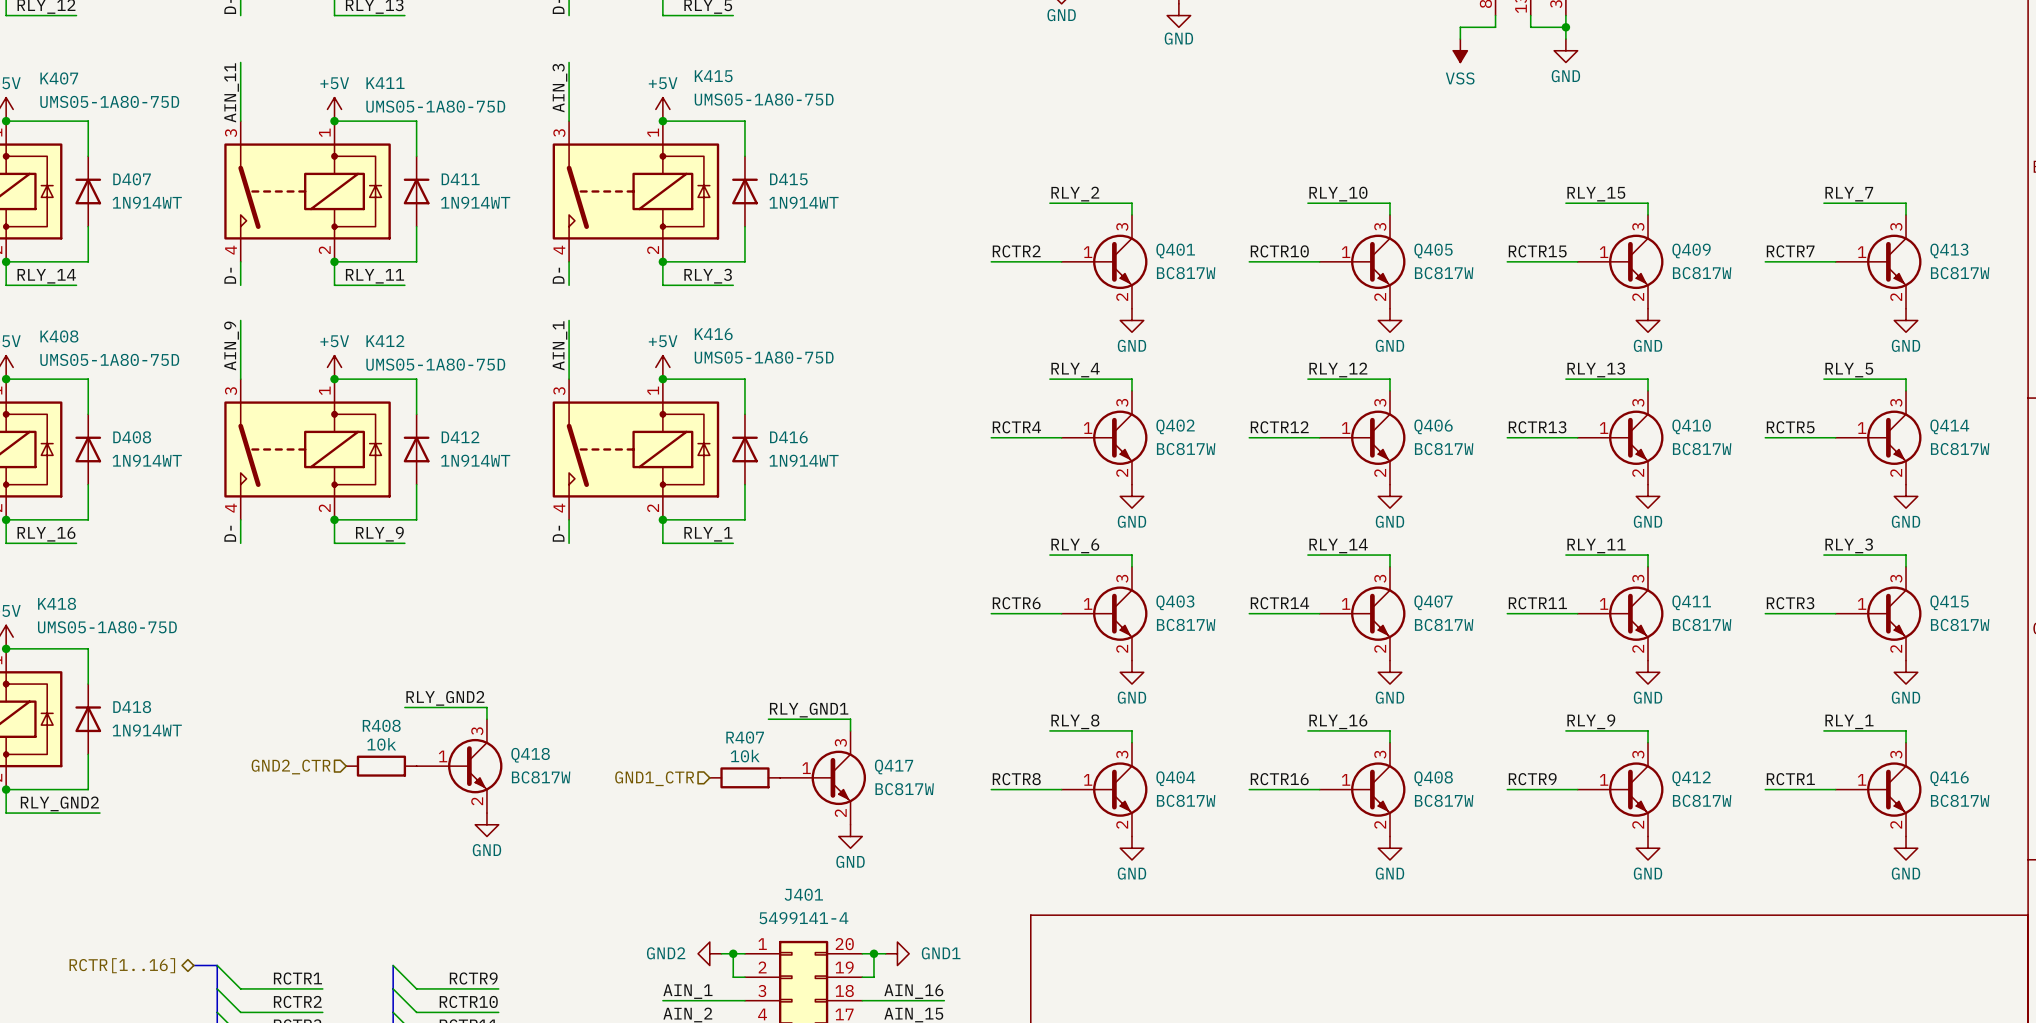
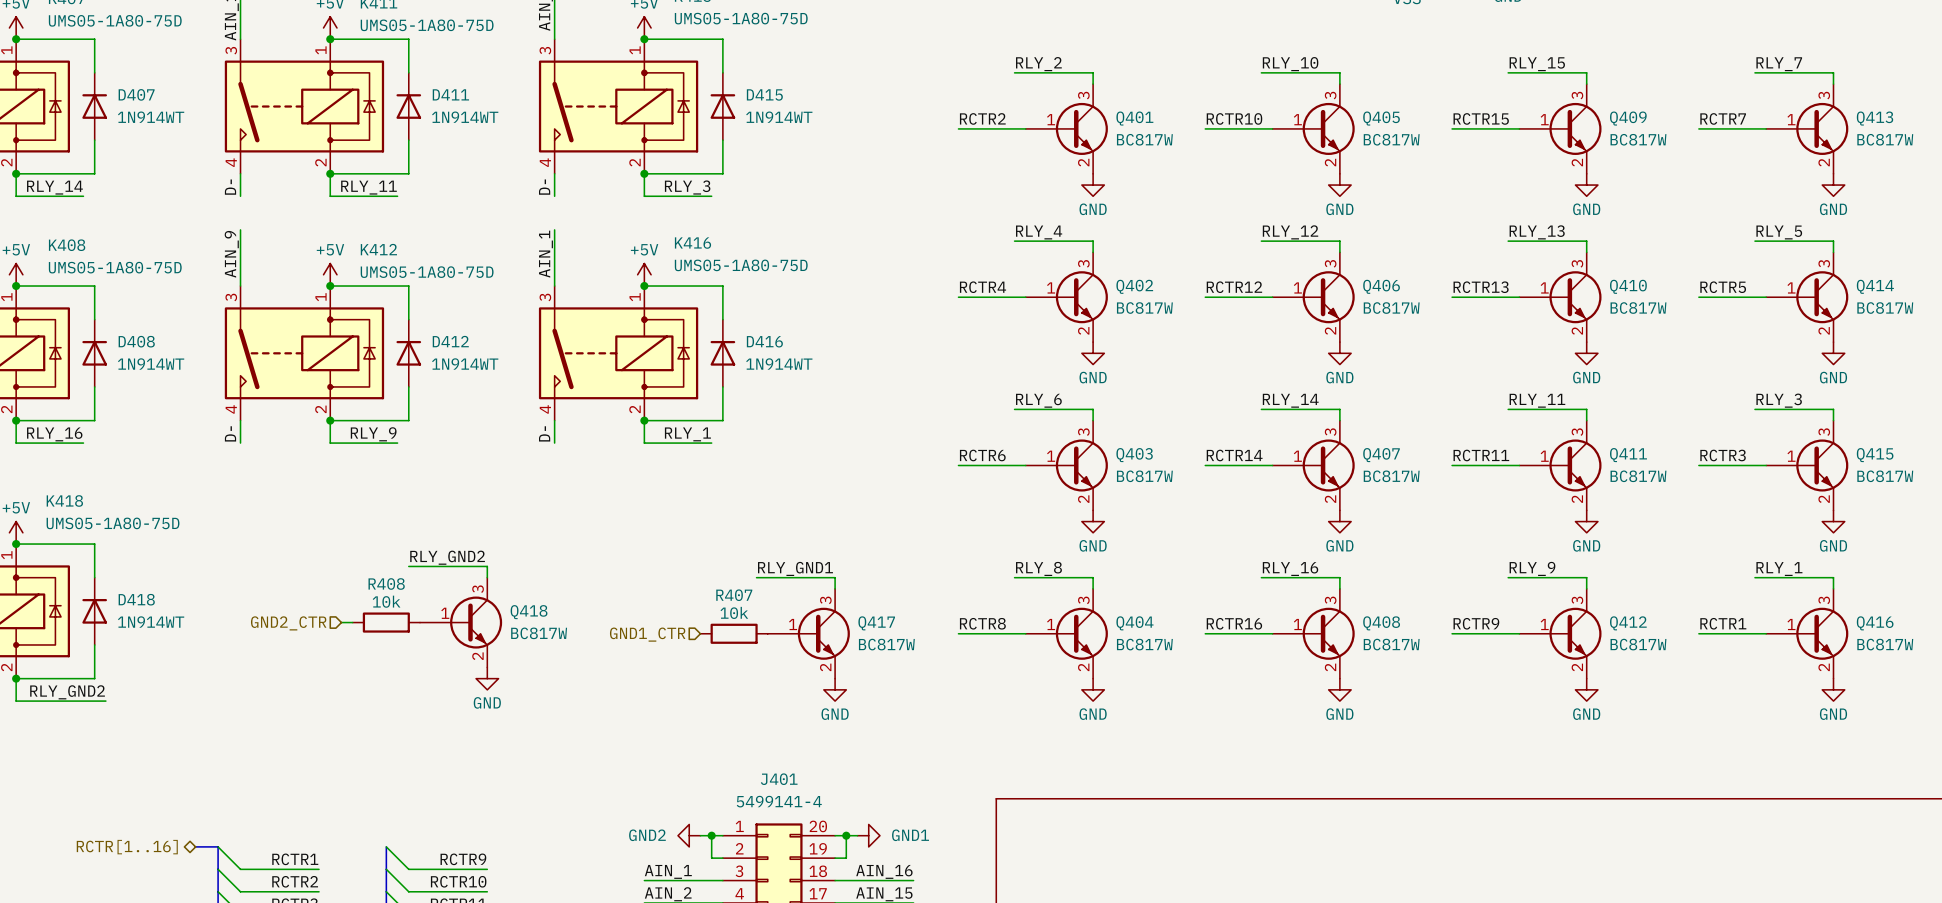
label position: RLY_2 (1075, 194) -> RLY_2 (1038, 64)
label position: RLY_10 (1338, 194) -> RLY_10 (1290, 64)
label position: RLY_15 (1596, 194) -> RLY_15 (1537, 64)
label position: RLY_7 (1849, 194) -> RLY_7 (1779, 64)
wire: (1049, 203) (1131, 203) (1131, 214) -> (1014, 72) (1093, 72) (1093, 84)
wire: (1307, 203) (1389, 203) (1389, 214) -> (1261, 72) (1339, 72) (1339, 84)
wire: (1565, 203) (1648, 203) (1648, 214) -> (1508, 72) (1586, 72) (1586, 84)
wire: (1823, 203) (1906, 203) (1906, 214) -> (1754, 72) (1833, 72) (1833, 84)
label position: RCTR2 (1016, 251) -> RCTR2 (982, 118)
label position: RCTR10 (1279, 251) -> RCTR10 (1234, 118)
label position: RCTR15 (1537, 251) -> RCTR15 (1481, 118)
label position: RCTR7 (1790, 251) -> RCTR7 (1723, 118)
wire: (991, 261) (1061, 261) -> (958, 128) (1025, 128)
Q401 position: (1104, 261) -> (1066, 128)
wire: (1249, 261) (1319, 261) -> (1205, 128) (1272, 128)
Q405 position: (1362, 261) -> (1313, 128)
wire: (1507, 261) (1577, 261) -> (1452, 128) (1519, 128)
Q409 position: (1620, 261) -> (1560, 128)
wire: (1765, 261) (1835, 261) -> (1698, 128) (1766, 128)
Q413 position: (1878, 261) -> (1807, 128)
power symbol position: GND (1131, 320) -> GND (1093, 185)
power symbol position: GND (1389, 320) -> GND (1339, 185)
power symbol position: GND (1648, 320) -> GND (1586, 185)
power symbol position: GND (1906, 320) -> GND (1833, 185)
label position: RLY_12 (1338, 369) -> RLY_12 (1290, 232)
label position: RLY_13 (1596, 369) -> RLY_13 (1537, 232)
label position: RLY_4 (1075, 370) -> RLY_4 (1039, 232)
label position: RLY_5 (1849, 370) -> RLY_5 (1779, 232)
wire: (1049, 379) (1131, 379) (1131, 390) -> (1014, 241) (1093, 241) (1093, 252)
wire: (1307, 379) (1389, 379) (1389, 390) -> (1261, 241) (1339, 241) (1339, 252)
wire: (1565, 379) (1648, 379) (1648, 390) -> (1508, 241) (1586, 241) (1586, 252)
wire: (1823, 379) (1906, 379) (1906, 390) -> (1754, 241) (1833, 241) (1833, 252)
label position: RCTR4 (1016, 427) -> RCTR4 (983, 287)
label position: RCTR12 (1279, 427) -> RCTR12 (1234, 287)
label position: RCTR13 (1537, 427) -> RCTR13 (1481, 287)
label position: RCTR5 (1790, 427) -> RCTR5 (1723, 287)
wire: (991, 437) (1061, 437) -> (958, 297) (1025, 297)
Q402 position: (1104, 437) -> (1066, 297)
wire: (1249, 437) (1319, 437) -> (1205, 297) (1272, 297)
Q406 position: (1362, 437) -> (1313, 297)
wire: (1507, 437) (1577, 437) -> (1452, 297) (1519, 297)
Q410 position: (1620, 437) -> (1560, 297)
wire: (1765, 437) (1835, 437) -> (1698, 297) (1766, 297)
Q414 position: (1878, 437) -> (1807, 297)
power symbol position: GND (1131, 496) -> GND (1093, 353)
power symbol position: GND (1389, 496) -> GND (1339, 353)
power symbol position: GND (1648, 496) -> GND (1586, 353)
power symbol position: GND (1906, 496) -> GND (1833, 353)
label position: RLY_6 (1075, 545) -> RLY_6 (1038, 400)
label position: RLY_14 (1338, 545) -> RLY_14 (1290, 400)
label position: RLY_11 (1596, 545) -> RLY_11 (1537, 400)
label position: RLY_3 (1849, 545) -> RLY_3 (1779, 400)
wire: (1049, 555) (1131, 555) (1131, 566) -> (1014, 409) (1093, 409) (1093, 420)
wire: (1307, 555) (1389, 555) (1389, 566) -> (1261, 409) (1339, 409) (1339, 420)
wire: (1565, 555) (1648, 555) (1648, 566) -> (1508, 409) (1586, 409) (1586, 420)
wire: (1823, 555) (1906, 555) (1906, 566) -> (1754, 409) (1833, 409) (1833, 420)
label position: RCTR6 (1016, 603) -> RCTR6 (982, 455)
label position: RCTR14 (1279, 603) -> RCTR14 (1234, 455)
label position: RCTR11 (1537, 603) -> RCTR11 (1481, 455)
label position: RCTR3 (1790, 603) -> RCTR3 (1723, 455)
wire: (991, 613) (1061, 613) -> (958, 465) (1025, 465)
Q403 position: (1104, 613) -> (1066, 465)
wire: (1249, 613) (1319, 613) -> (1205, 465) (1272, 465)
Q407 position: (1362, 613) -> (1313, 465)
wire: (1507, 613) (1577, 613) -> (1452, 465) (1519, 465)
Q411 position: (1620, 613) -> (1560, 465)
wire: (1765, 613) (1835, 613) -> (1698, 465) (1766, 465)
Q415 position: (1878, 613) -> (1807, 465)
power symbol position: GND (1131, 672) -> GND (1093, 521)
power symbol position: GND (1389, 672) -> GND (1339, 521)
power symbol position: GND (1648, 672) -> GND (1586, 521)
power symbol position: GND (1906, 672) -> GND (1833, 521)
label position: RLY_GND2 (445, 698) -> RLY_GND2 (447, 557)
wire: (404, 707) (486, 707) (486, 719) -> (408, 566) (487, 566) (487, 577)
label position: RLY_GND1 (809, 710) -> RLY_GND1 (795, 568)
wire: (768, 719) (850, 719) (850, 730) -> (756, 577) (835, 577) (835, 588)
label position: RLY_8 (1075, 721) -> RLY_8 (1038, 568)
label position: RLY_16 (1338, 721) -> RLY_16 (1290, 569)
label position: RLY_9 (1591, 721) -> RLY_9 (1532, 568)
label position: RLY_1 (1849, 721) -> RLY_1 (1779, 569)
wire: none -> (341, 622) (352, 622)
wire: (1049, 730) (1131, 730) (1131, 742) -> (1014, 577) (1093, 577) (1093, 588)
wire: (1307, 730) (1389, 730) (1389, 742) -> (1261, 577) (1339, 577) (1339, 588)
wire: (1565, 730) (1648, 730) (1648, 742) -> (1508, 577) (1586, 577) (1586, 588)
wire: (1823, 730) (1906, 730) (1906, 742) -> (1754, 577) (1833, 577) (1833, 588)
R408 position: (381, 766) -> (386, 622)
Q418 position: (459, 766) -> (461, 622)
hierarchical label position: GND2_CTR (291, 767) -> GND2_CTR (288, 623)
R407 position: (744, 777) -> (734, 633)
Q417 position: (823, 777) -> (808, 633)
hierarchical label position: GND1_CTR (654, 778) -> GND1_CTR (647, 634)
label position: RCTR8 (1016, 779) -> RCTR8 (982, 623)
label position: RCTR16 (1279, 779) -> RCTR16 (1234, 623)
label position: RCTR9 (1532, 779) -> RCTR9 (1476, 623)
label position: RCTR1 (1790, 779) -> RCTR1 (1723, 623)
wire: (991, 789) (1061, 789) -> (958, 633) (1025, 633)
Q404 position: (1104, 789) -> (1066, 633)
wire: (1249, 789) (1319, 789) -> (1205, 633) (1272, 633)
Q408 position: (1362, 789) -> (1313, 633)
wire: (1507, 789) (1577, 789) -> (1452, 633) (1519, 633)
Q412 position: (1620, 789) -> (1560, 633)
wire: (1765, 789) (1835, 789) -> (1698, 633) (1766, 633)
Q416 position: (1878, 789) -> (1807, 633)
power symbol position: GND (486, 824) -> GND (487, 678)
power symbol position: GND (850, 836) -> GND (835, 689)
power symbol position: GND (1131, 848) -> GND (1093, 689)
power symbol position: GND (1389, 848) -> GND (1339, 689)
power symbol position: GND (1648, 848) -> GND (1586, 689)
power symbol position: GND (1906, 848) -> GND (1833, 689)

